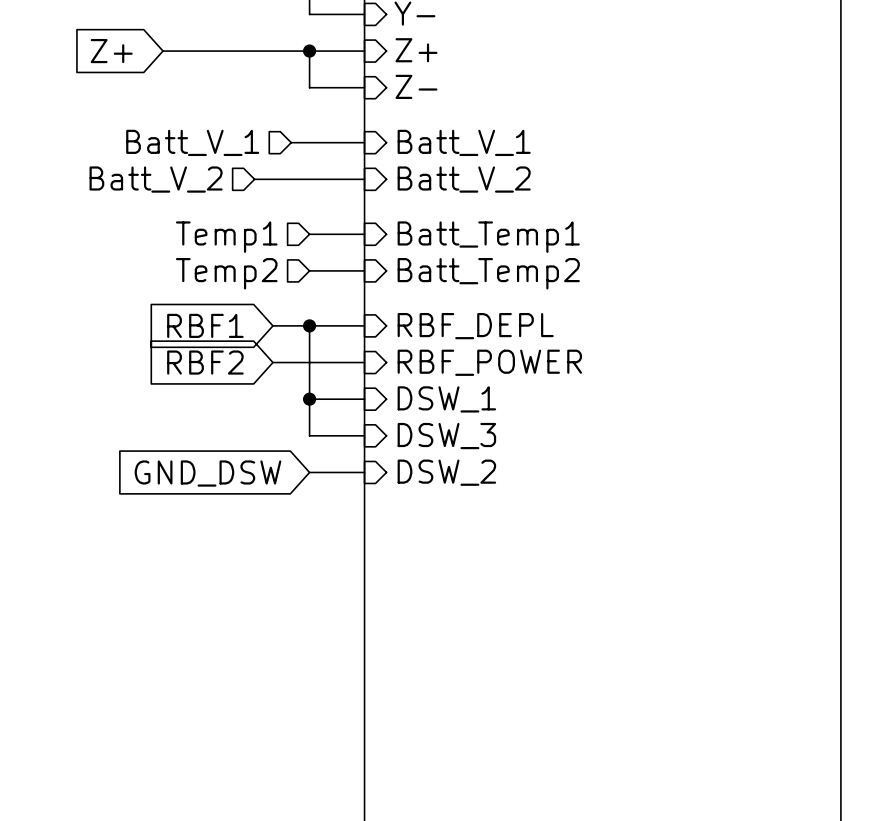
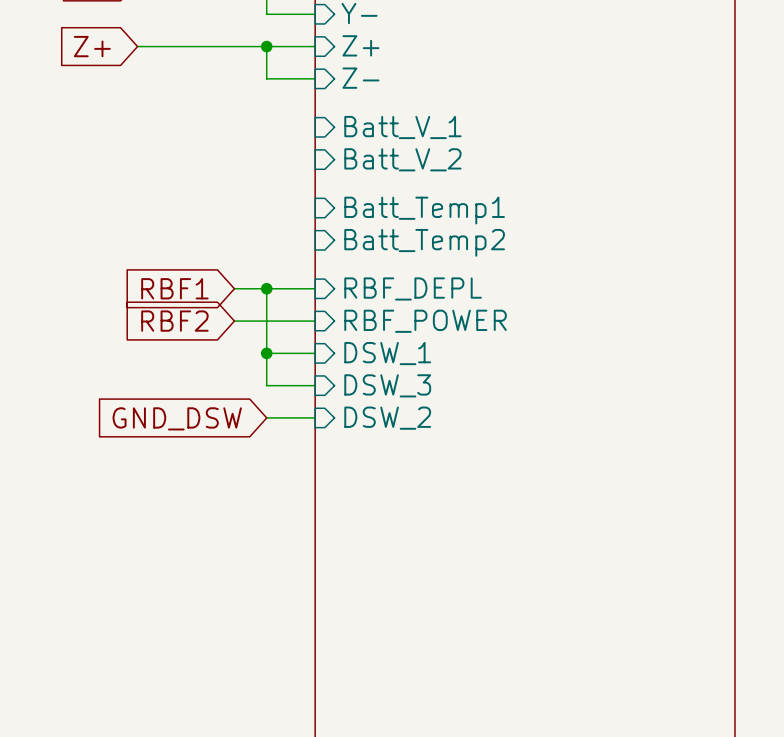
hierarchical label: Batt_V_1 (192, 142) -> none
wire: (291, 142) (364, 142) -> none
hierarchical label: Batt_V_2 (156, 179) -> none
wire: (254, 179) (364, 179) -> none
wire: (309, 234) (364, 234) -> none
hierarchical label: Temp1 (226, 237) -> none
wire: (309, 270) (364, 270) -> none
hierarchical label: Temp2 (226, 273) -> none

